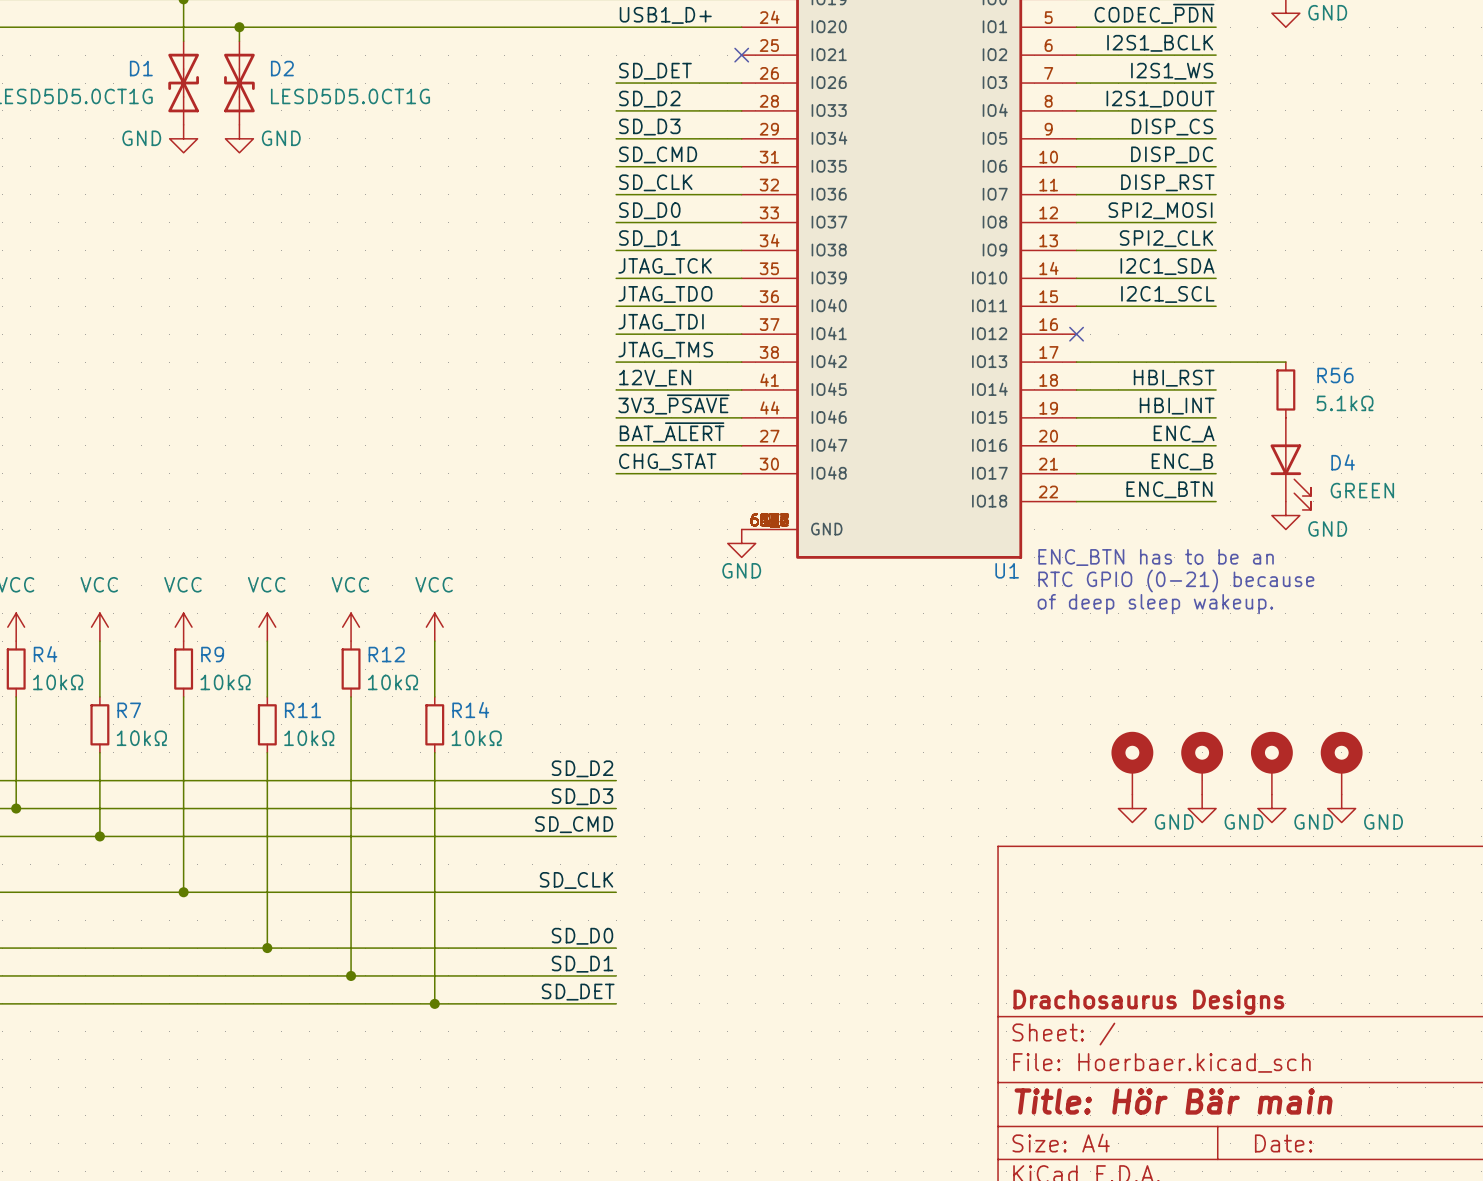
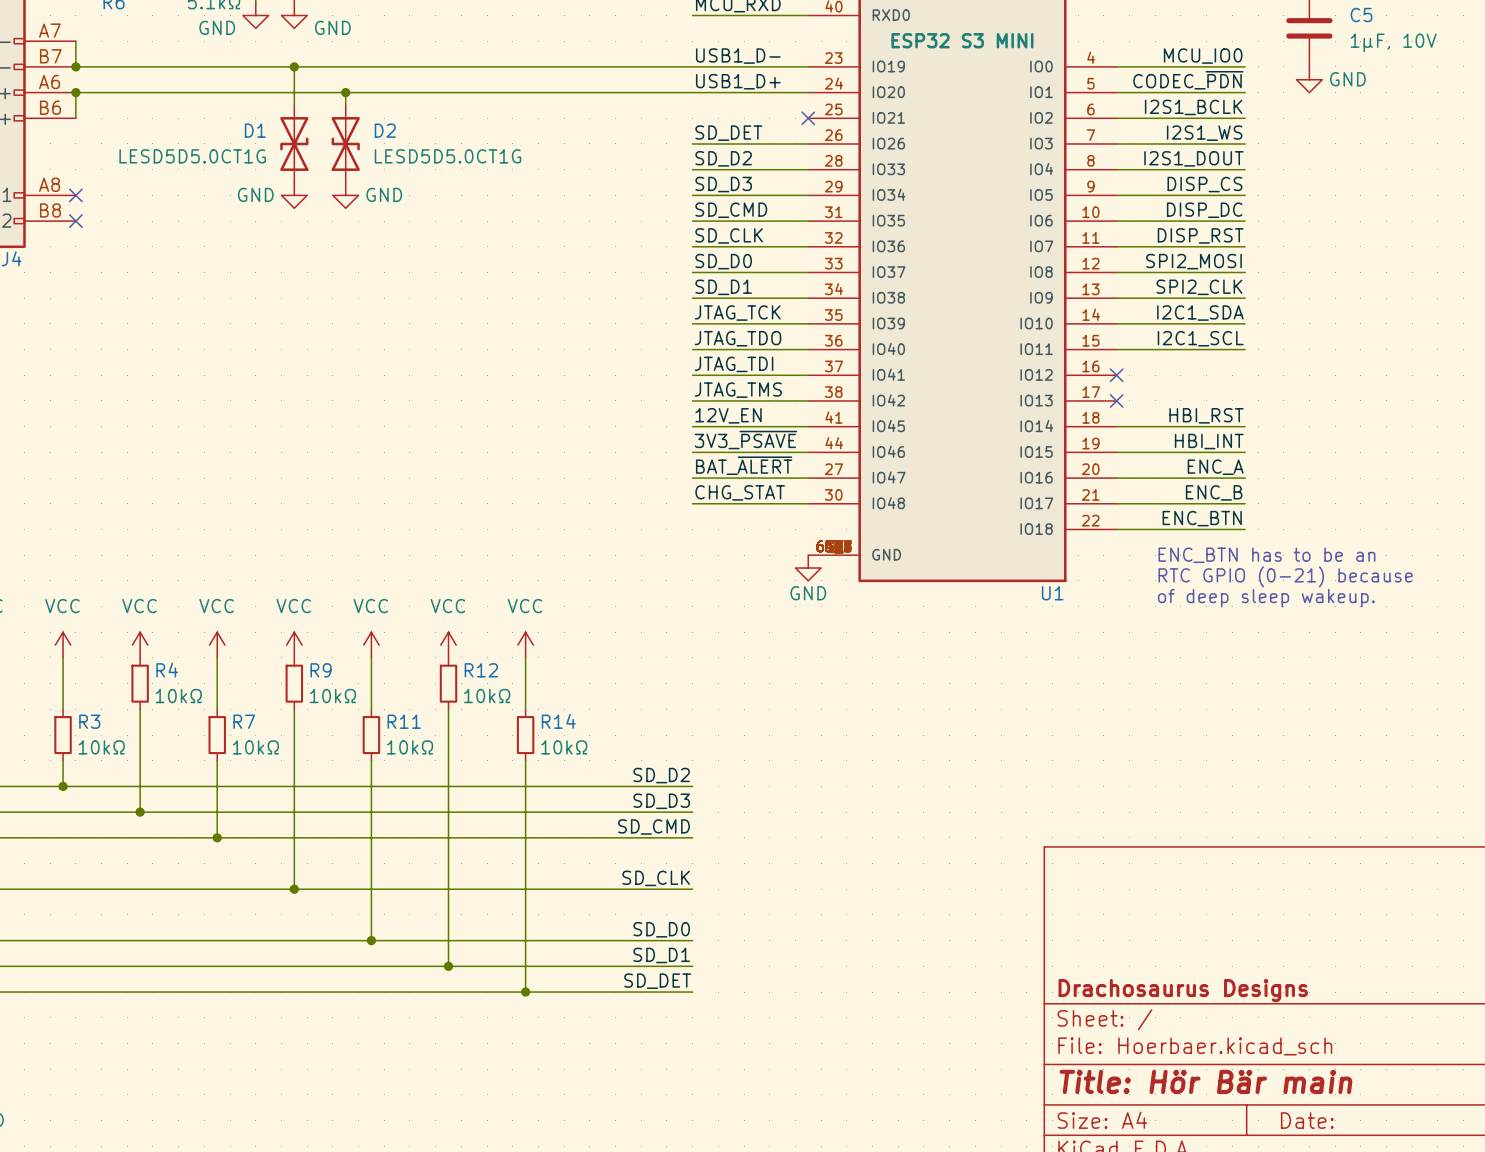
wire: (1076, 362) (1285, 362) -> none
no-connect mark: none -> (1116, 400)
R56: 5.1kΩ (1285, 389) -> none
D4: GREEN (1290, 463) -> none
power symbol: GND (1285, 515) -> none
text position: ENC_BTN has to be an (1156, 557) -> ENC_BTN has to be an (1266, 555)
text position: RTC GPIO (0-21) because (1176, 580) -> RTC GPIO (0-21) because (1285, 576)
text position: of deep sleep wakeup. (1155, 604) -> of deep sleep wakeup. (1266, 598)
part: (1132, 763) -> none
part: (1202, 763) -> none
part: (1271, 763) -> none
part: (1341, 763) -> none
power symbol: GND (1132, 808) -> none
power symbol: GND (1202, 808) -> none
power symbol: GND (1271, 808) -> none
power symbol: GND (1341, 808) -> none

